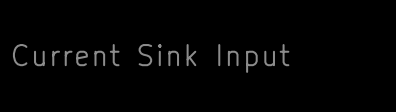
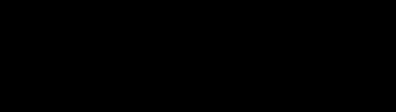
text: Current Sink Input (151, 58) -> none

